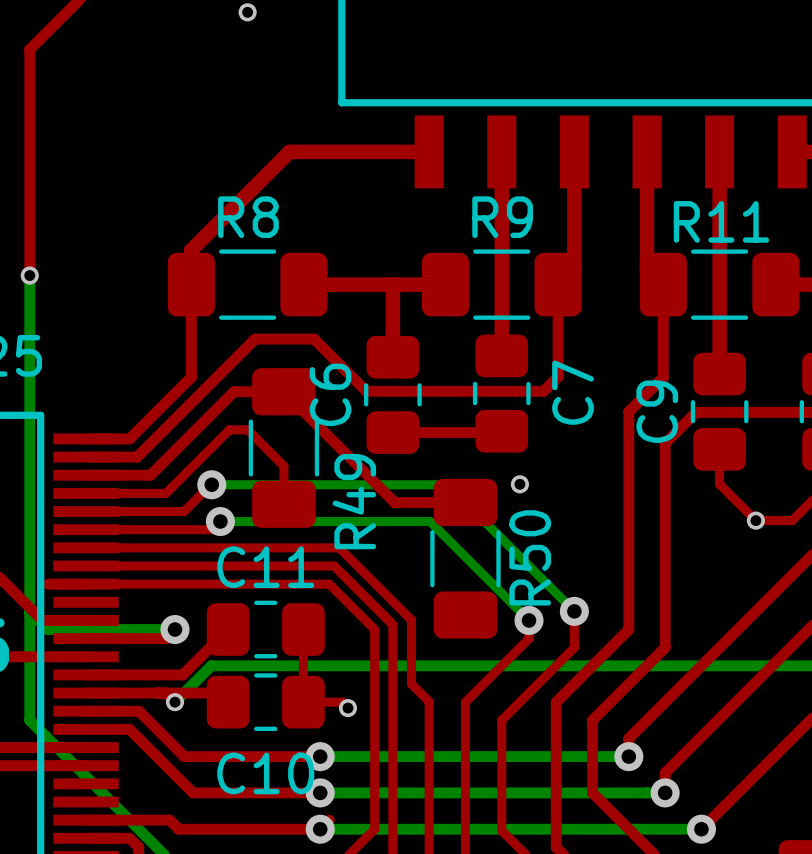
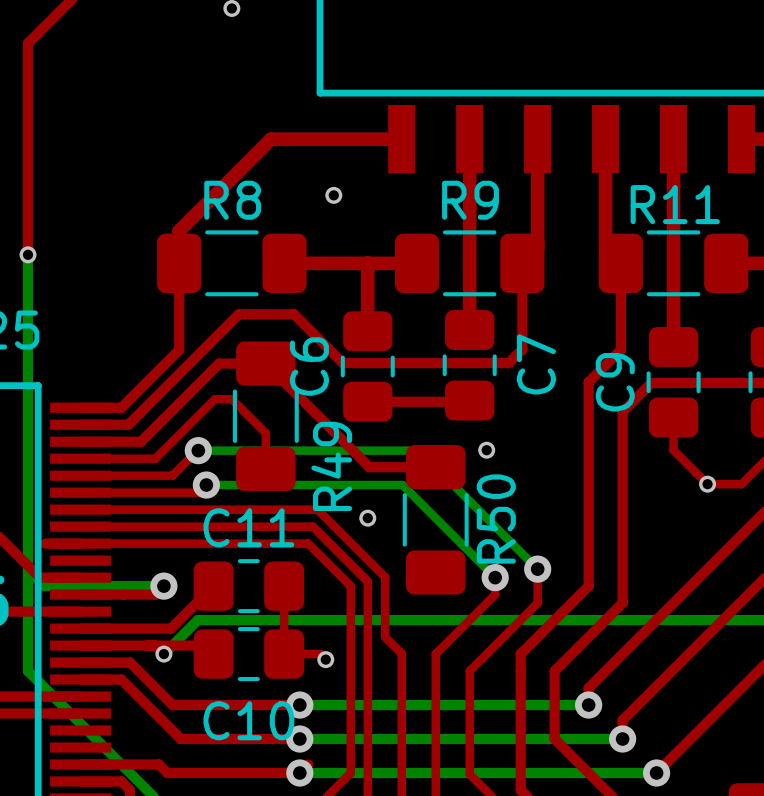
via: none -> (333, 195)
via: none -> (367, 518)

